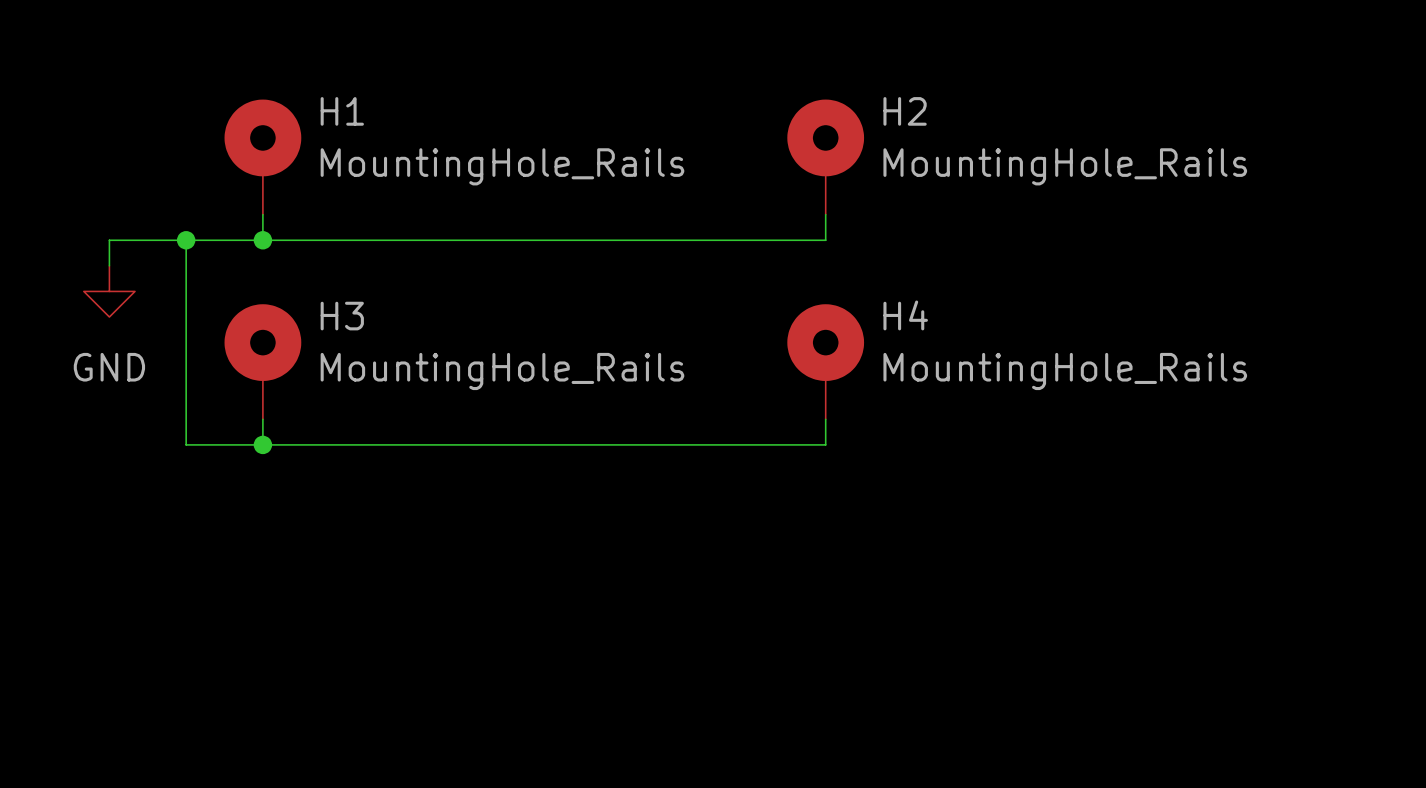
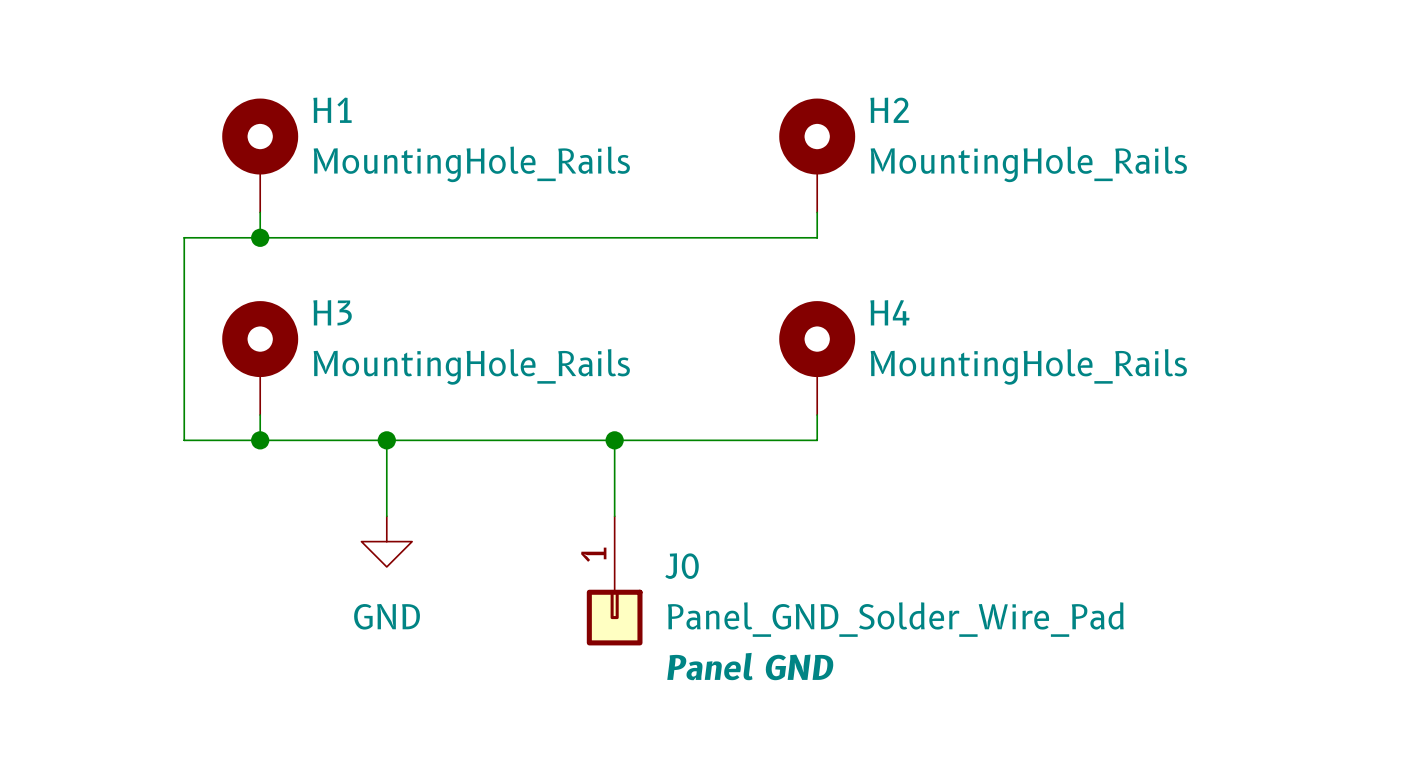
wire: (186, 240) (109, 240) (109, 265) -> none
junction: (186, 240) -> none
power symbol position: GND (109, 291) -> GND (386, 541)
wire: none -> (386, 440) (386, 516)
junction: none -> (386, 440)
wire: none -> (614, 440) (614, 516)
junction: none -> (614, 440)
J0: none -> Panel_GND_Solder_Wire_Pad (614, 580)

